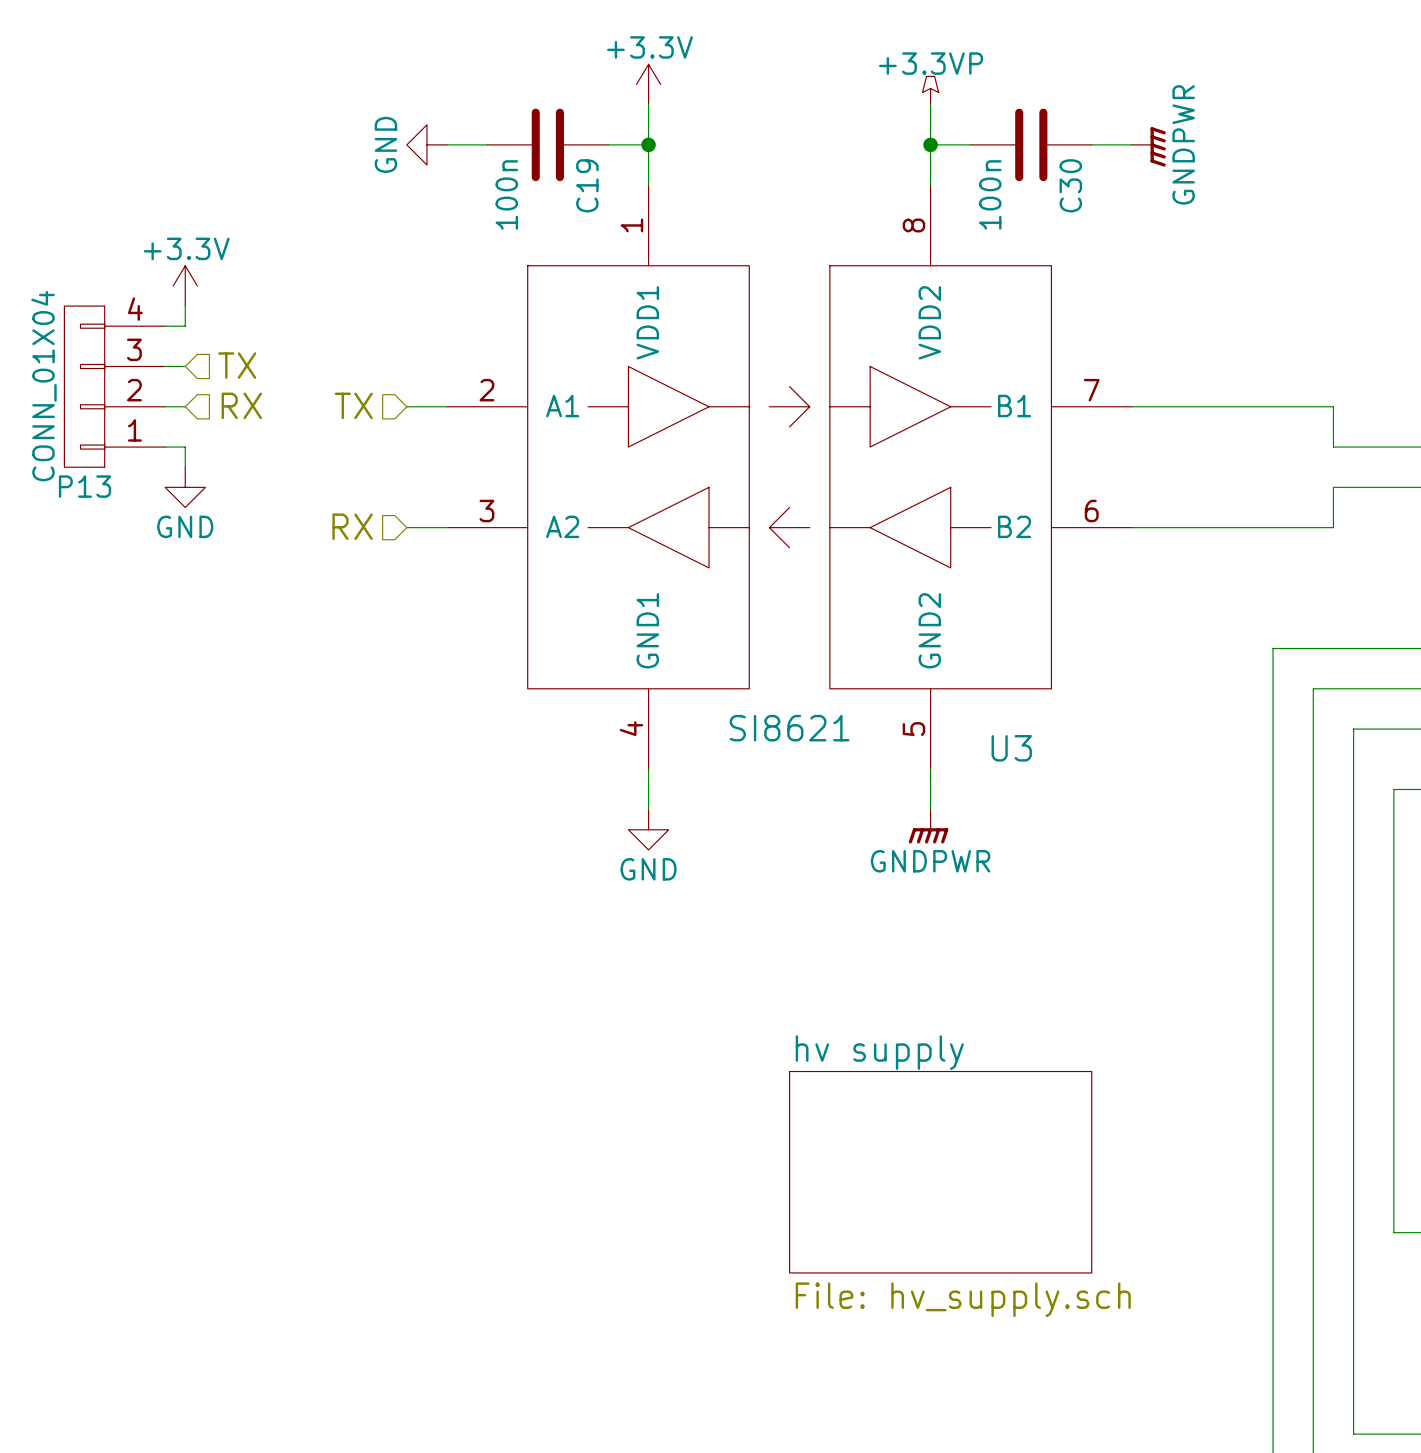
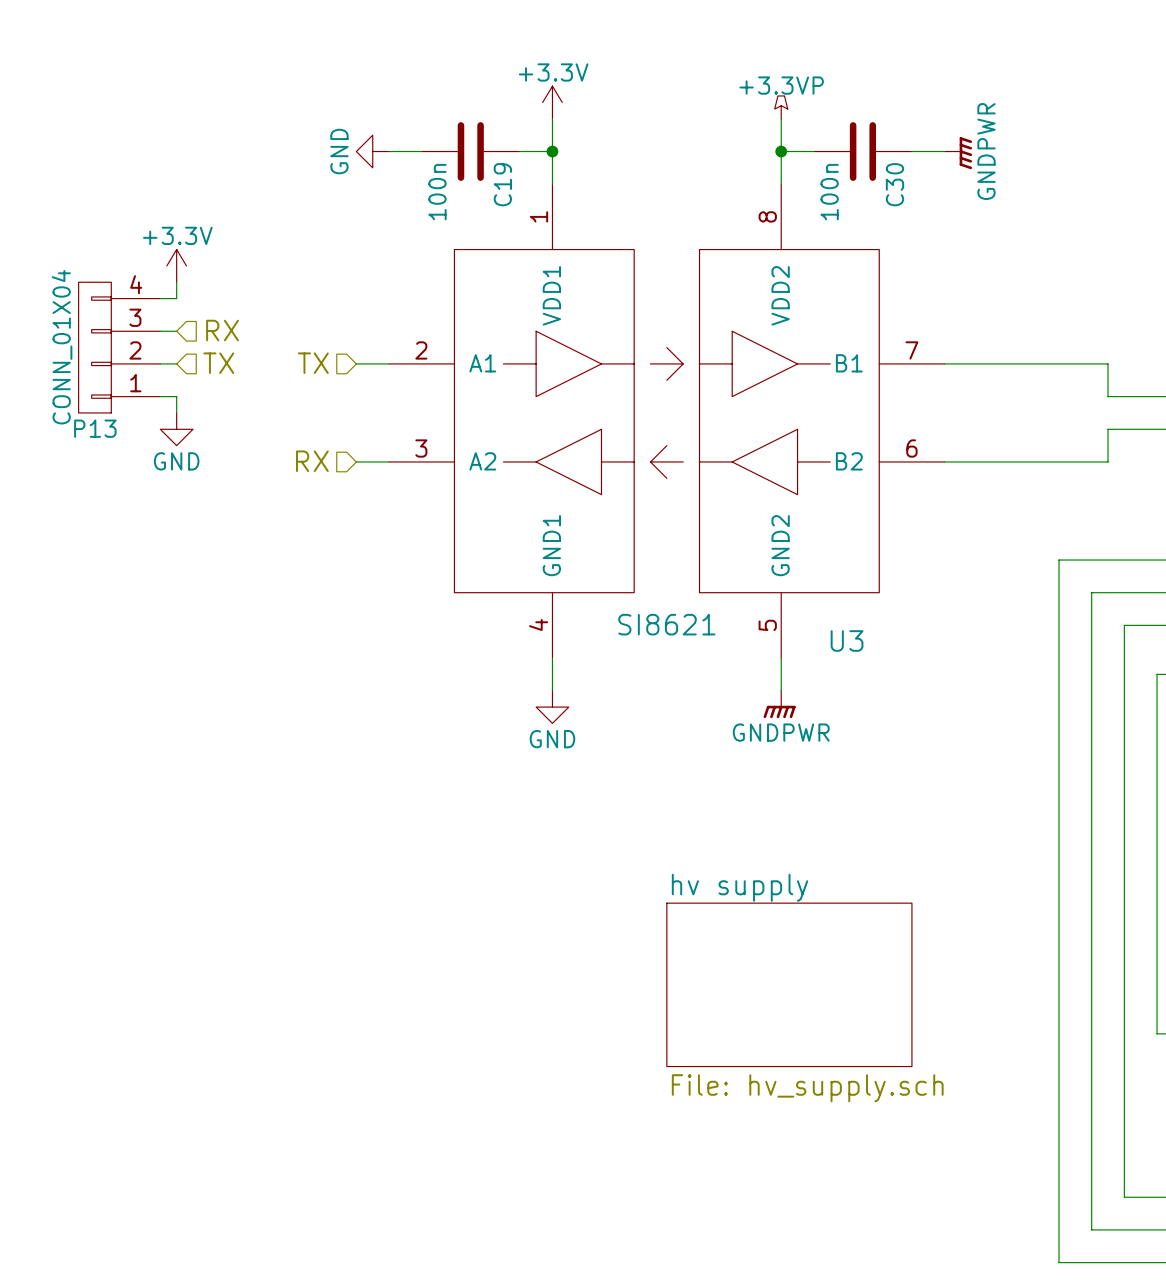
hierarchical label: TX (237, 365) -> RX (222, 330)
hierarchical label: RX (241, 405) -> TX (218, 363)

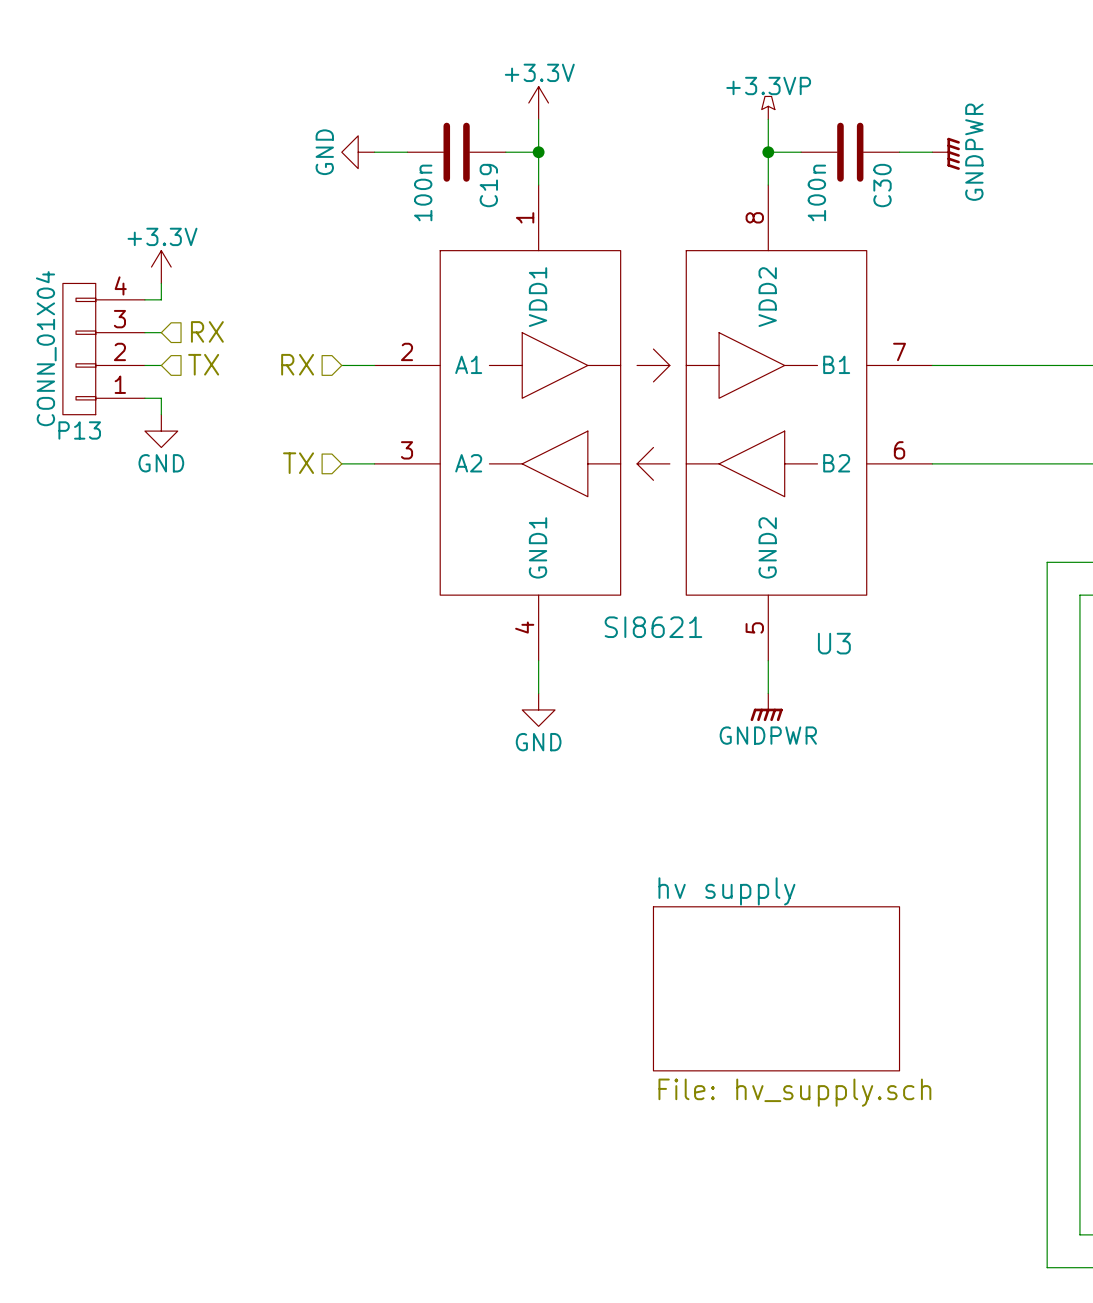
hierarchical label: TX (313, 363) -> RX (297, 364)
hierarchical label: RX (312, 461) -> TX (298, 463)

